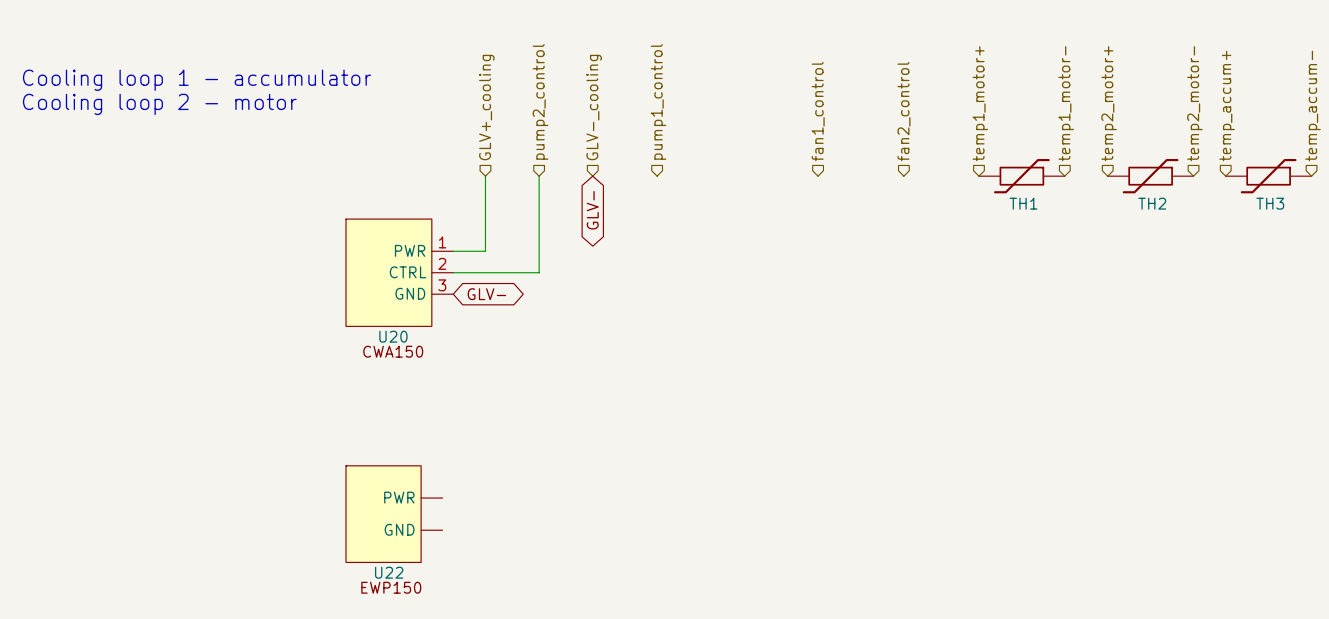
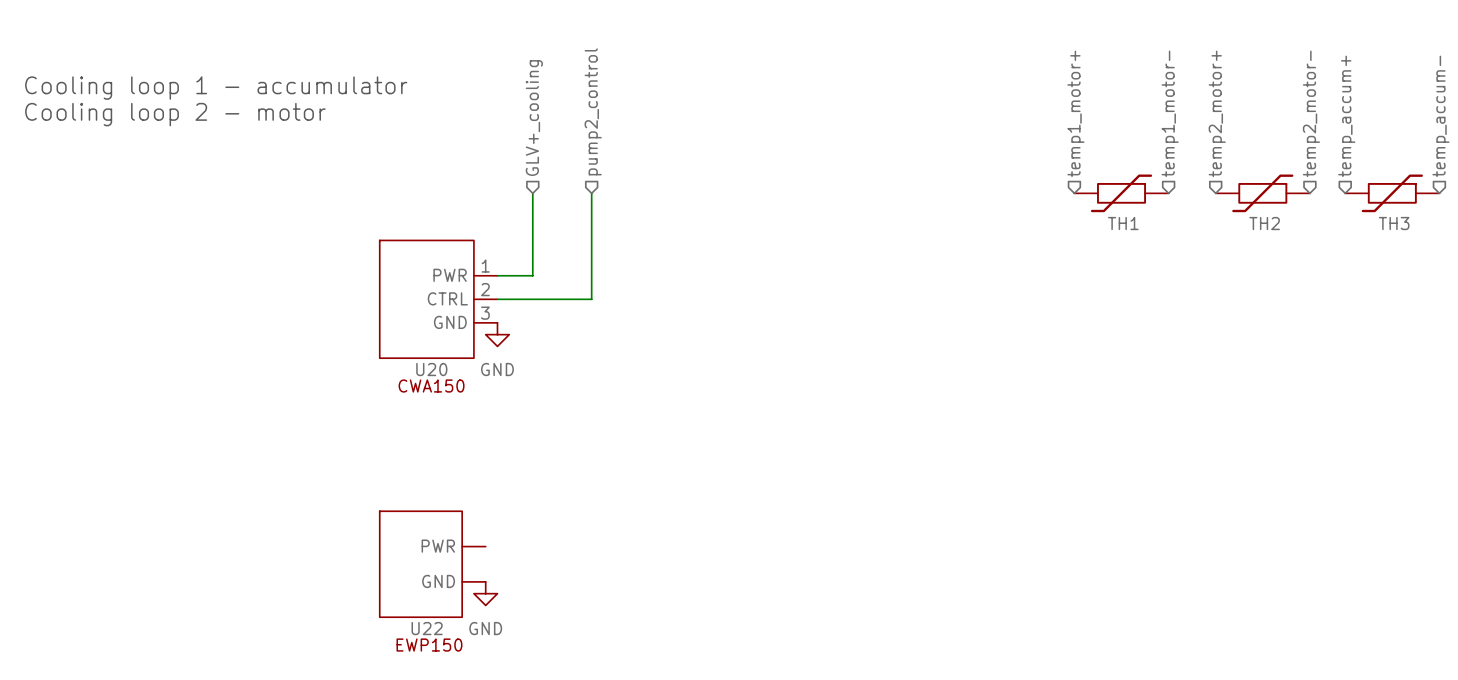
hierarchical label: pump1_control (658, 101) -> none
hierarchical label: GLV-_cooling (594, 107) -> none
hierarchical label: fan1_control (818, 111) -> none
hierarchical label: fan2_control (903, 111) -> none
global label: GLV- (592, 210) -> none
global label: GLV- (486, 294) -> none
power symbol: none -> GND (497, 334)
power symbol: none -> GND (485, 593)

